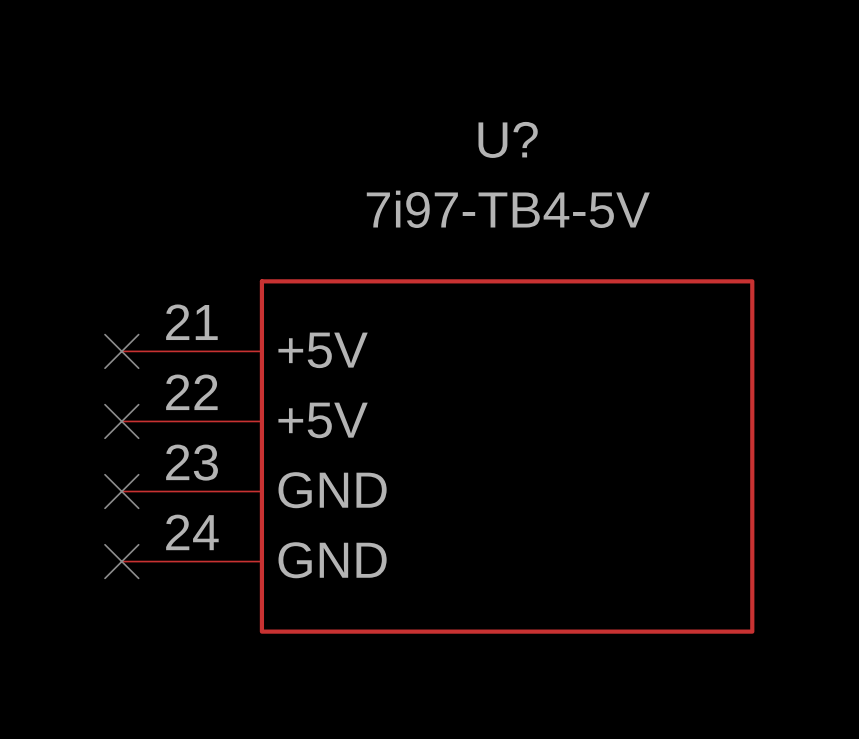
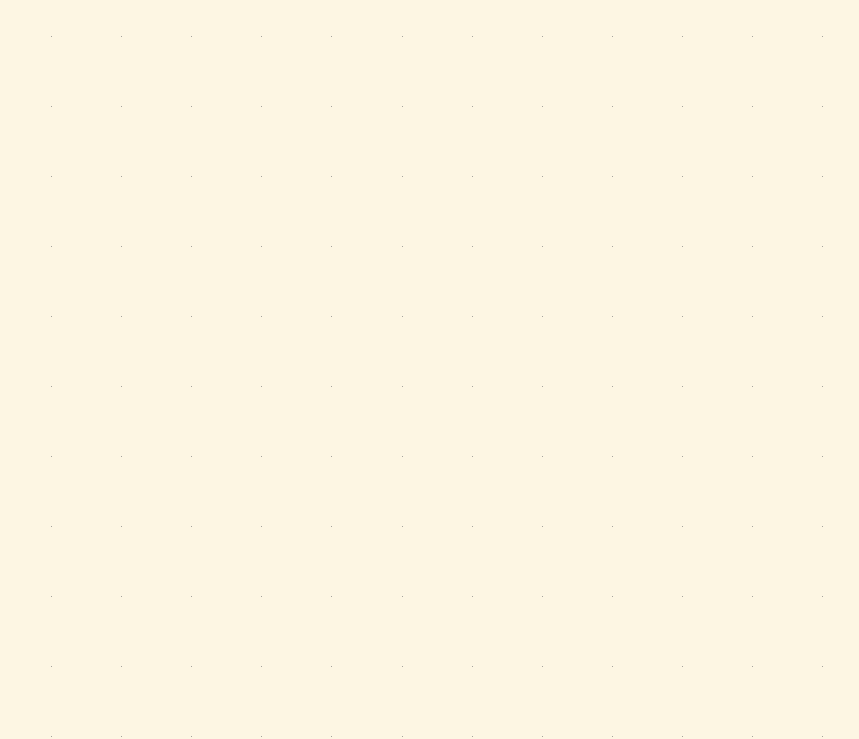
no-connect mark: (121, 351) -> none
no-connect mark: (121, 421) -> none
U?: 7i97-TB4-5V (438, 456) -> none
no-connect mark: (121, 491) -> none
no-connect mark: (121, 561) -> none

